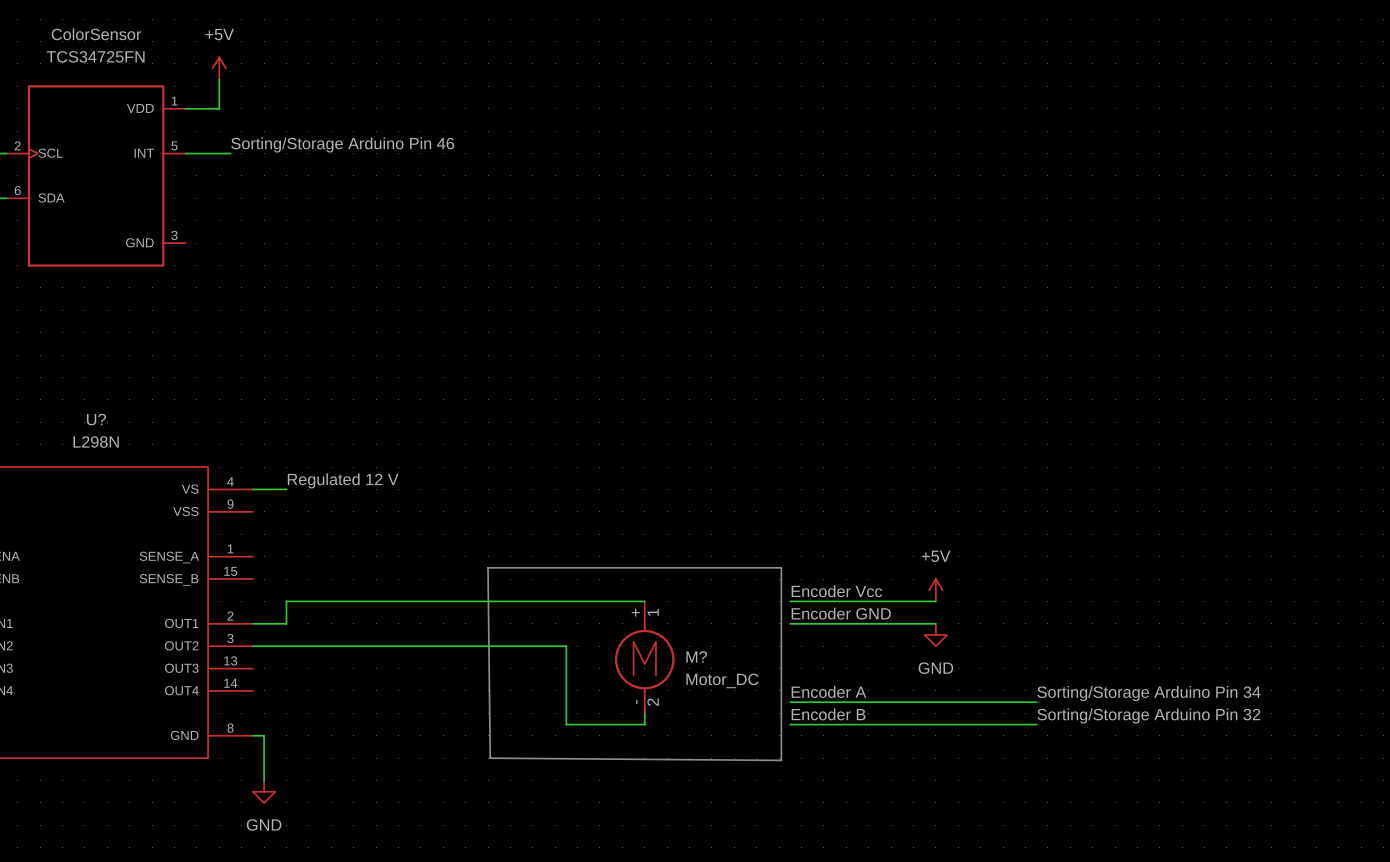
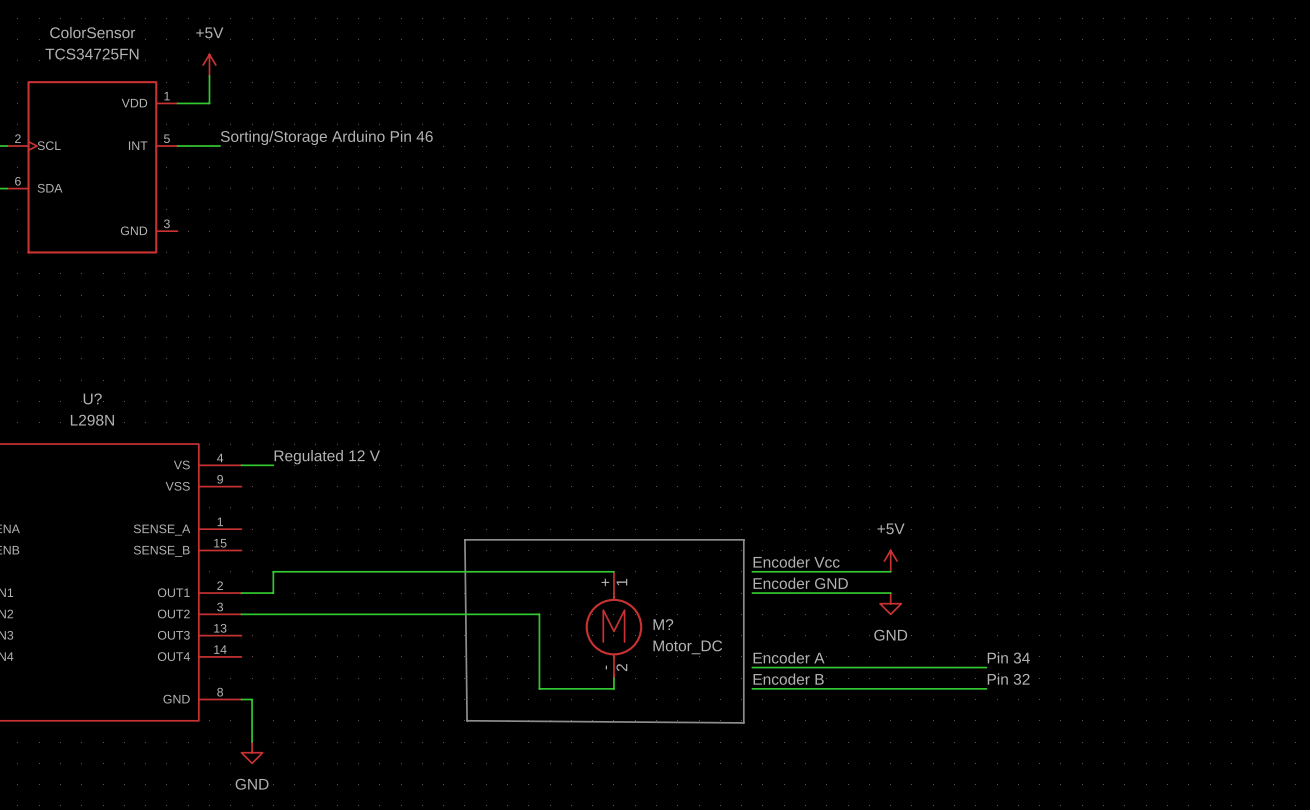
label: Sorting/Storage Arduino Pin 34 (1148, 693) -> Pin 34 (1008, 657)
label: Sorting/Storage Arduino Pin 32 (1148, 715) -> Pin 32 (1008, 679)

